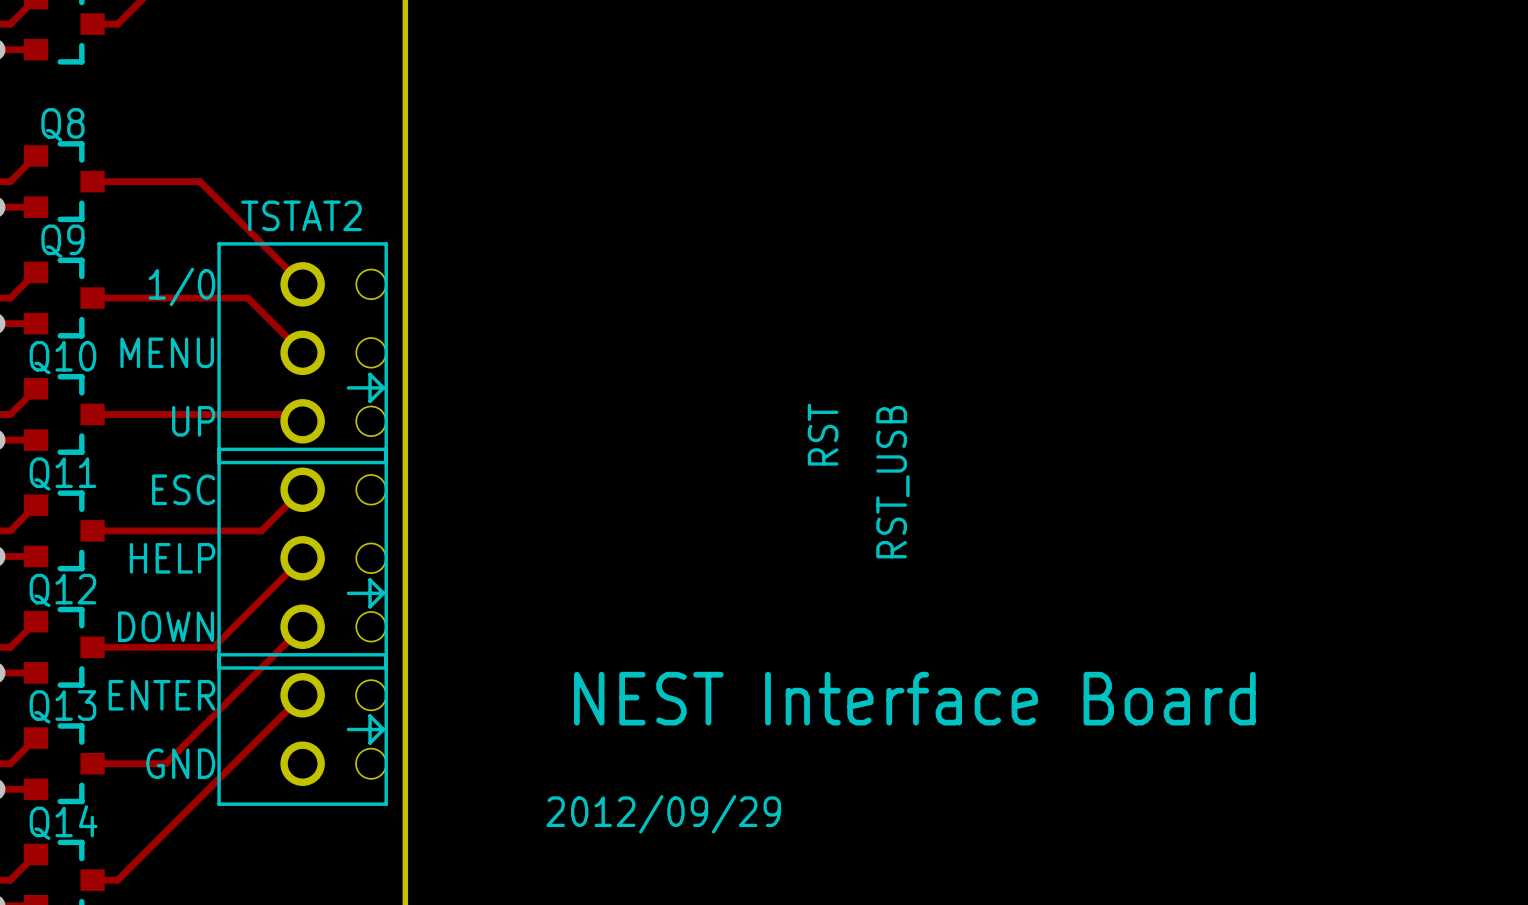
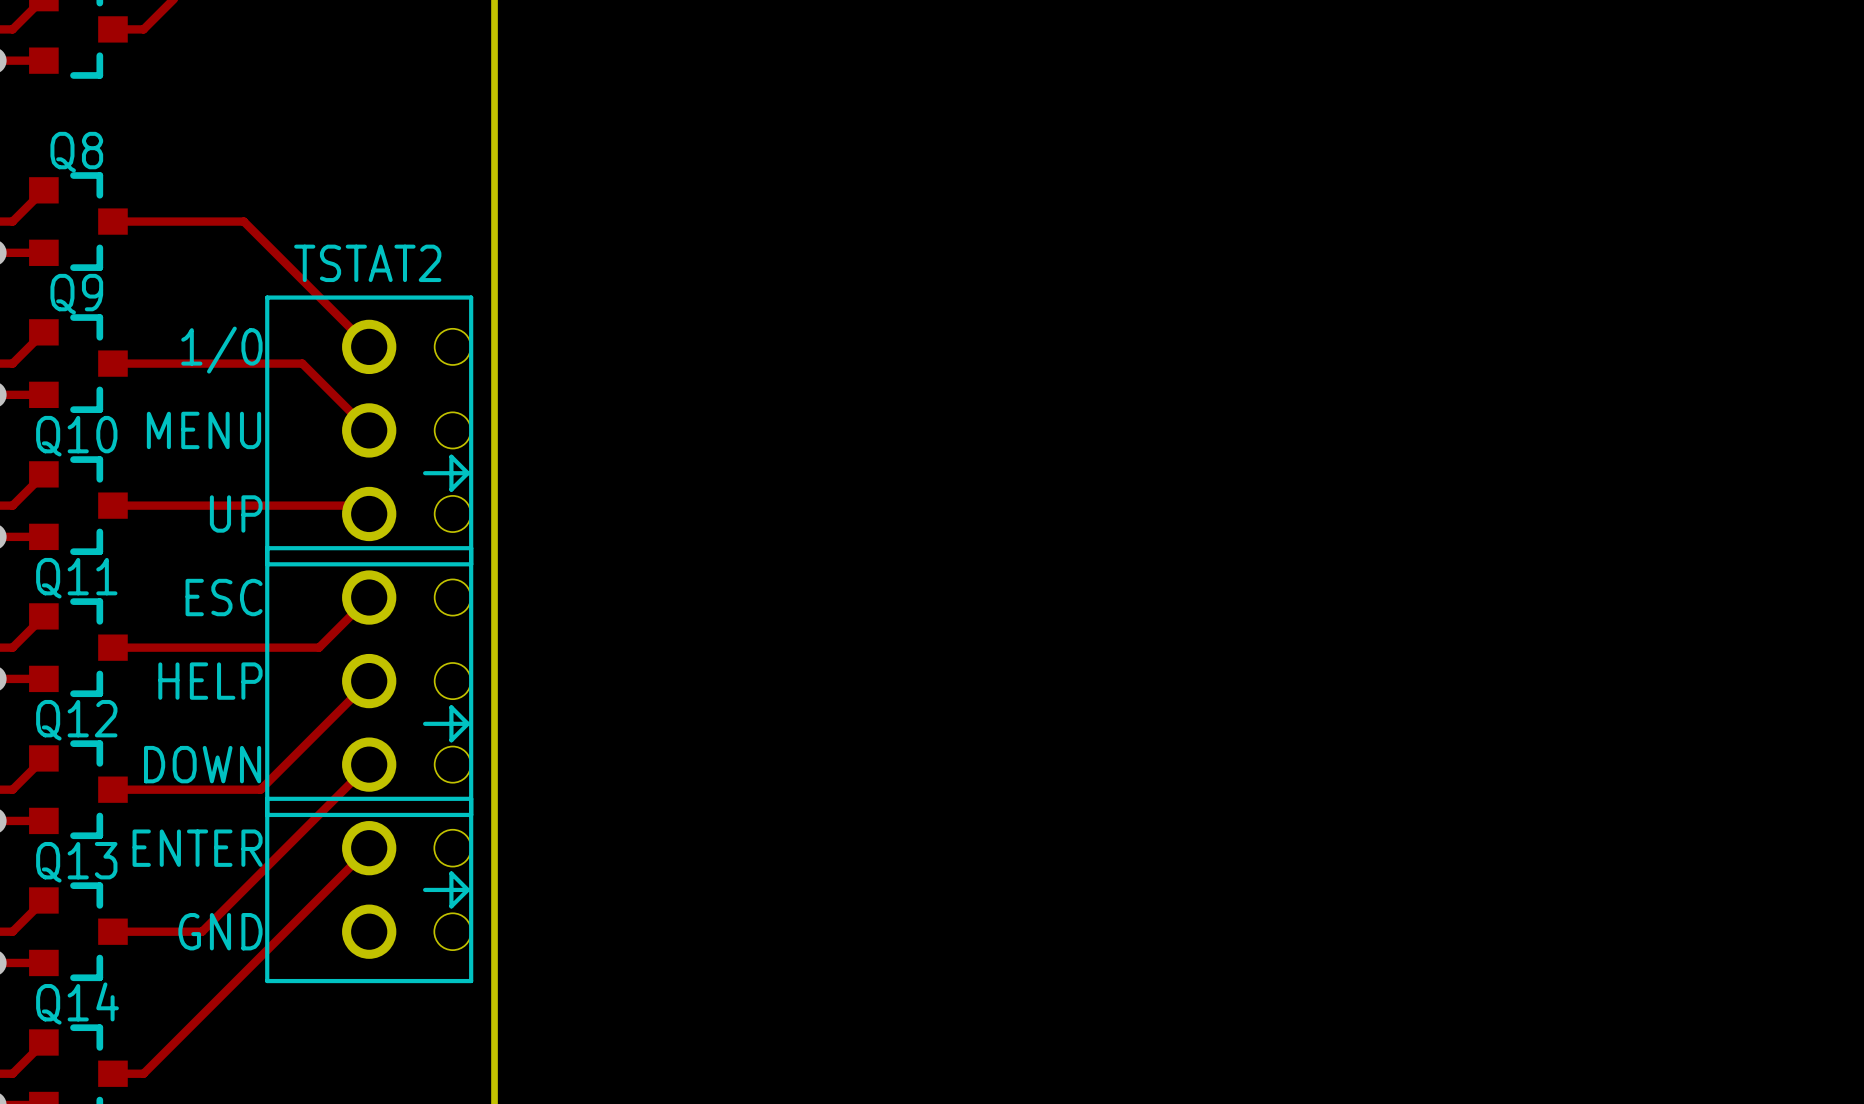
text: RST (823, 434) -> none
text: RST_USB (892, 482) -> none
text: NEST Interface Board (914, 698) -> none
text: 2012/09/29 (663, 814) -> none

